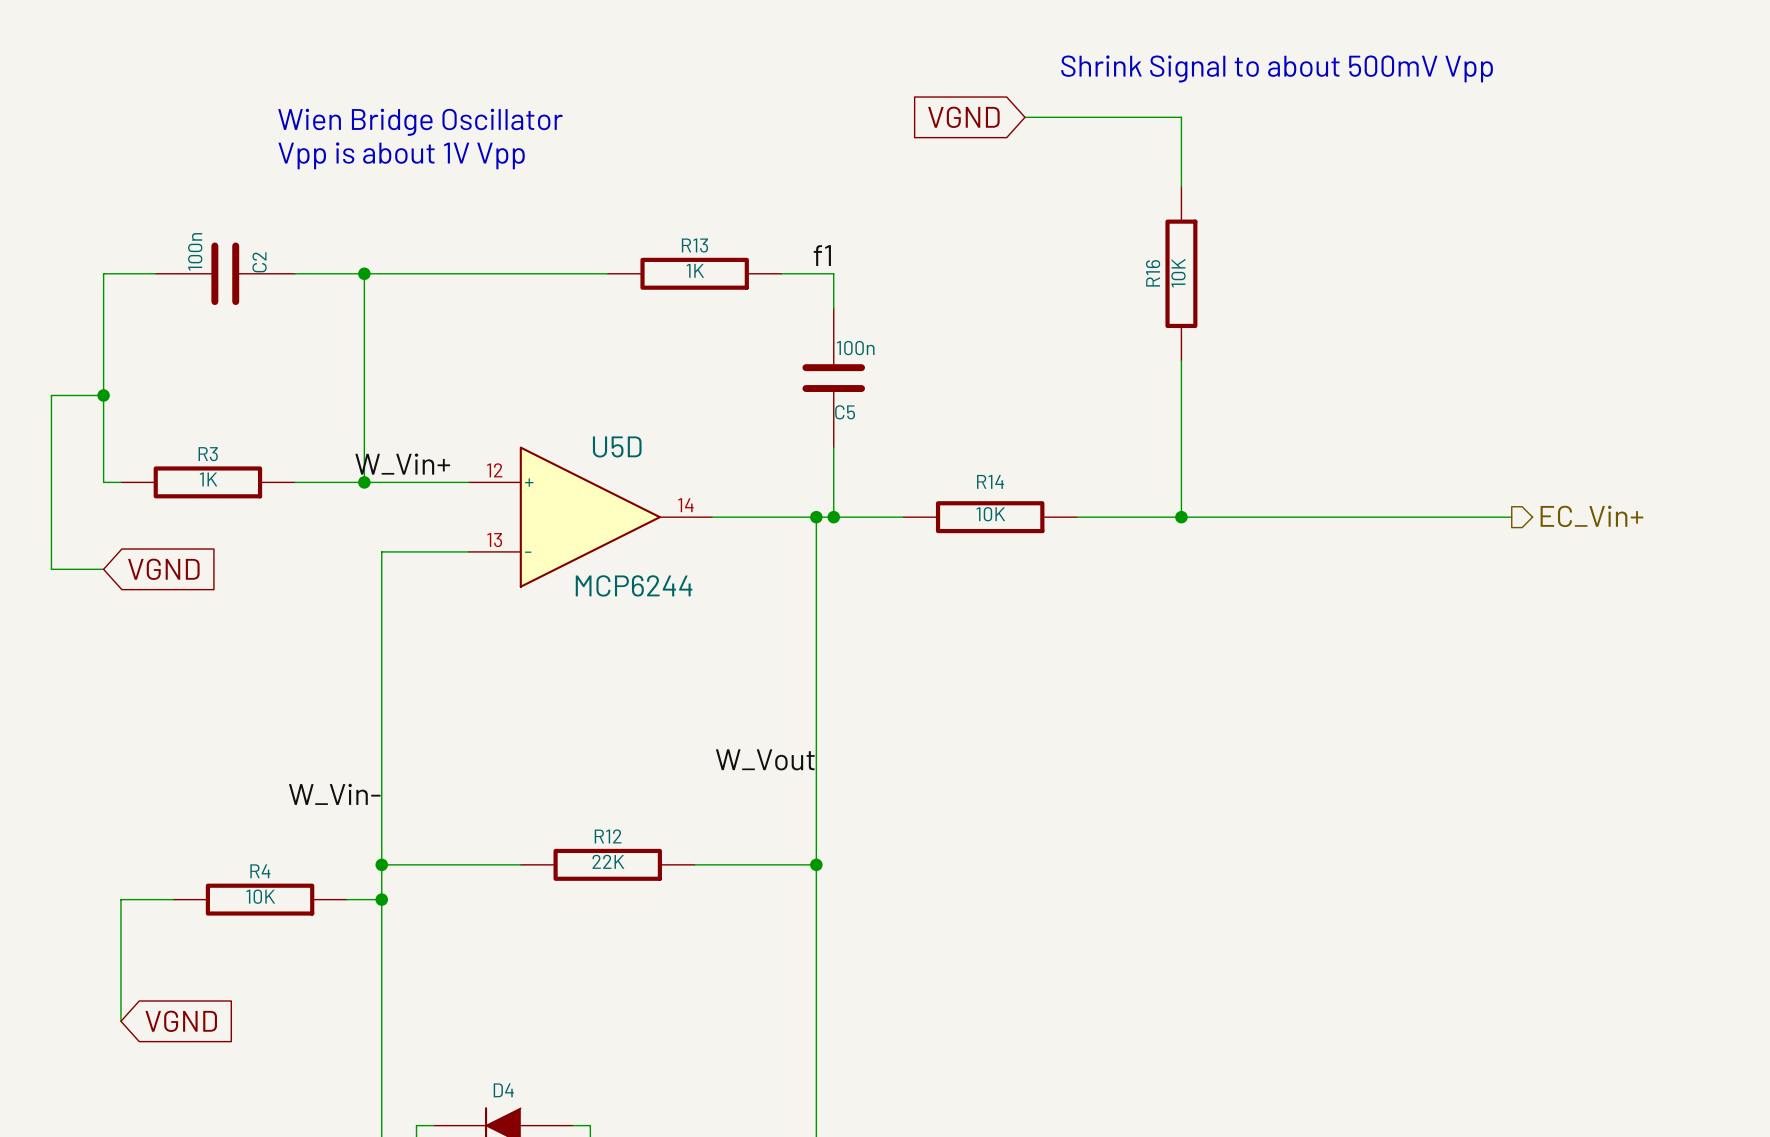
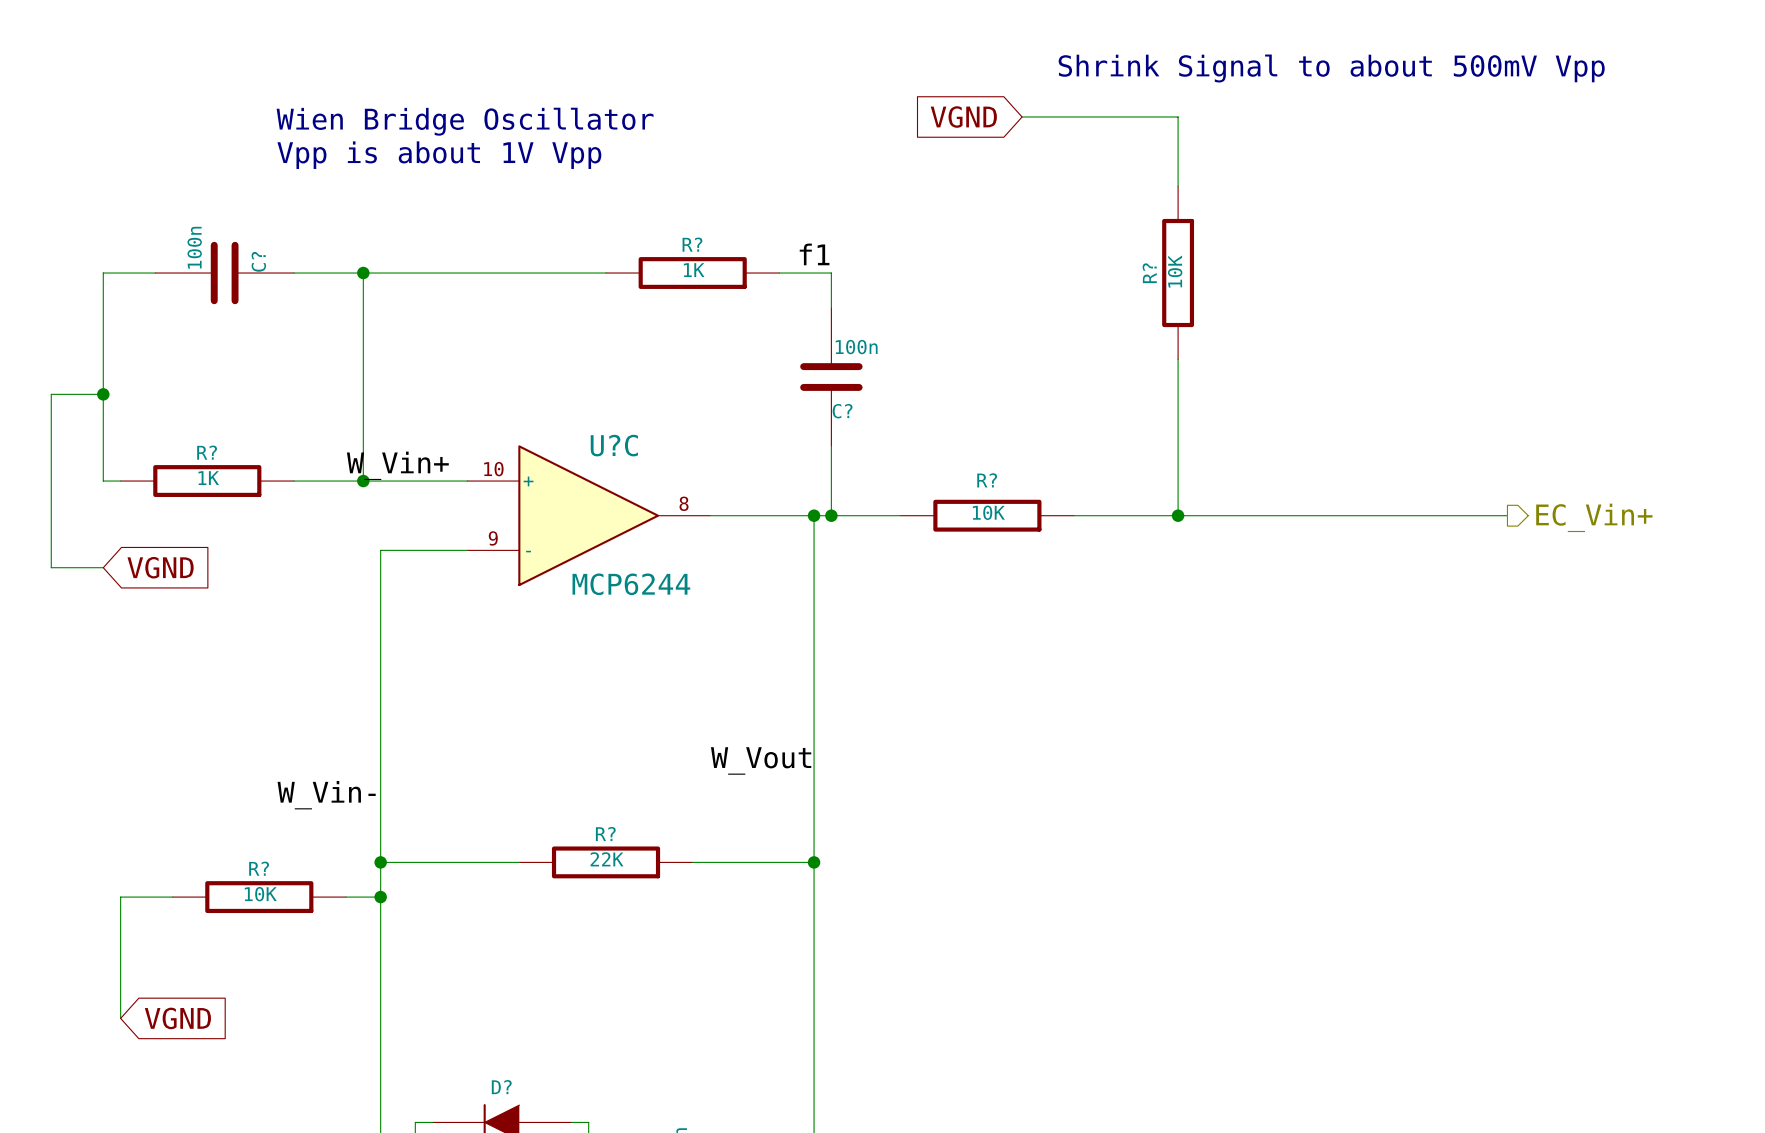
R13 name: R13 (694, 245) -> R? (692, 244)
C2 name: C2 (259, 262) -> C? (258, 261)
R16 name: R16 (1153, 273) -> R? (1149, 273)
C5 name: C5 (845, 412) -> C? (842, 411)
R3 name: R3 (208, 454) -> R? (207, 452)
R14 name: R14 (990, 481) -> R? (987, 480)
U5D: MCP6244 (590, 517) -> none
U?C: none -> MCP6244 (588, 515)
R12 name: R12 (608, 836) -> R? (605, 834)
R4 name: R4 (260, 871) -> R? (259, 868)
D4 name: D4 (503, 1090) -> D? (501, 1087)

